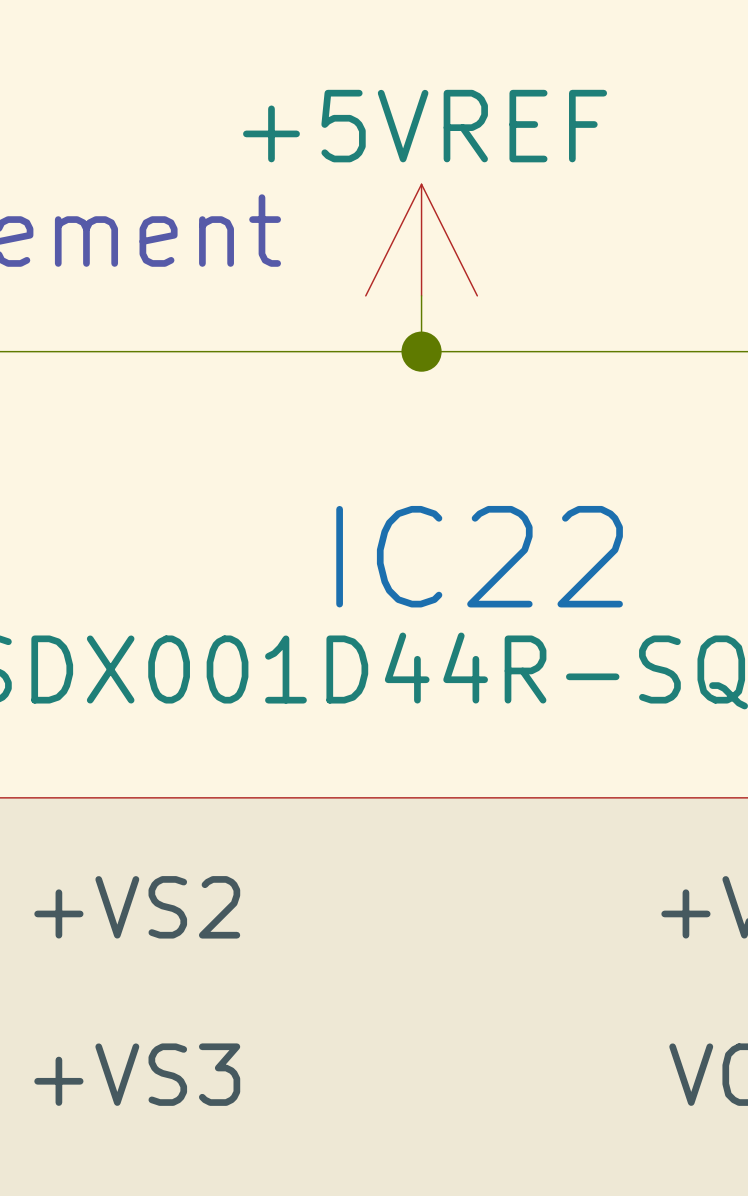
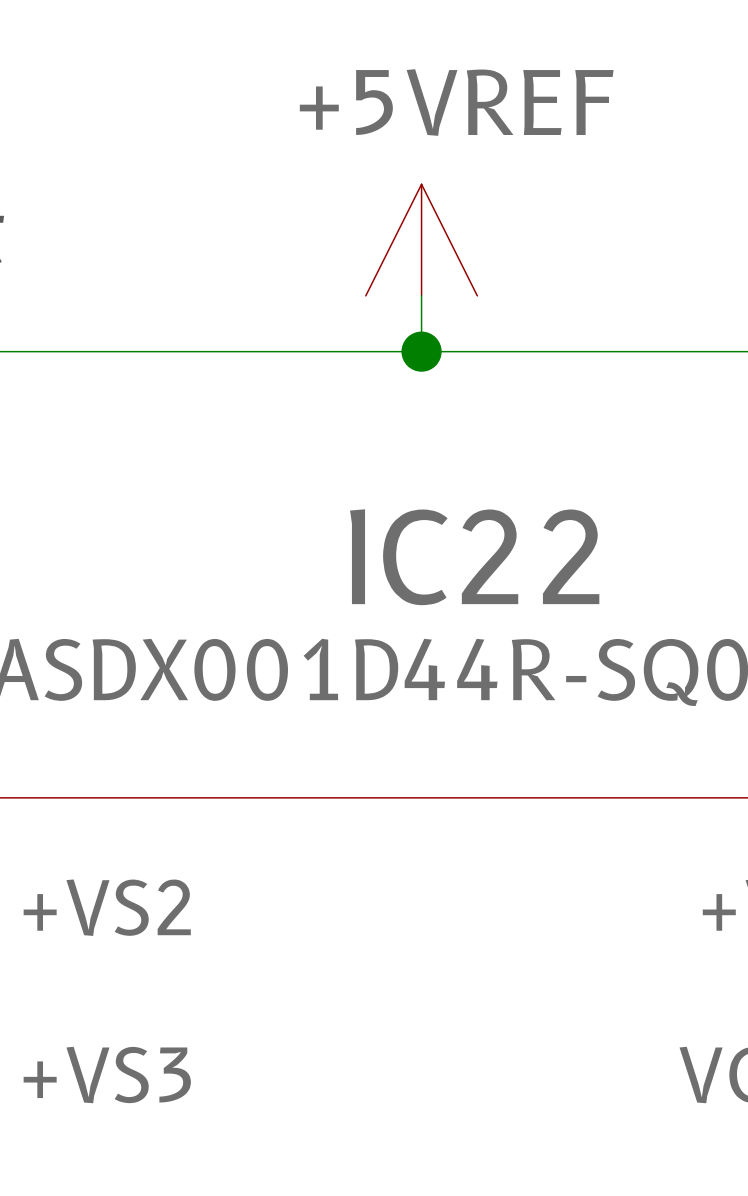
power symbol text position: +5VREF (425, 126) -> +5VREF (456, 102)

